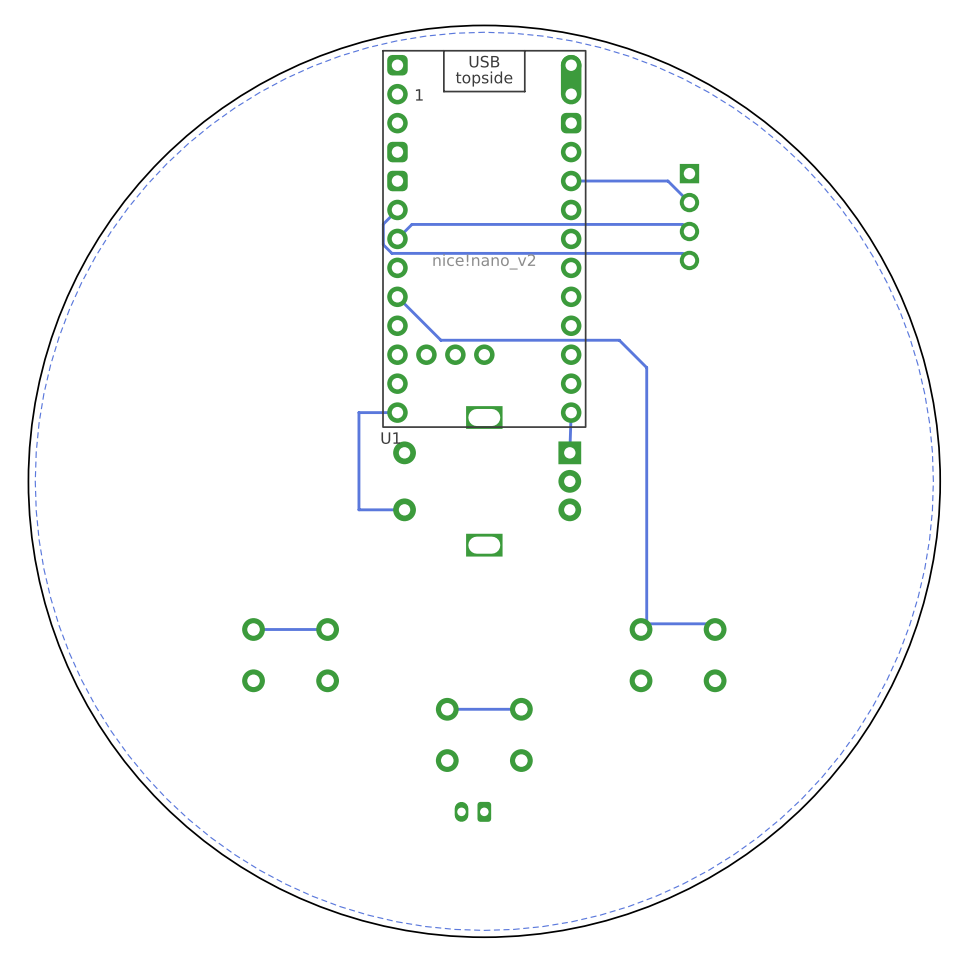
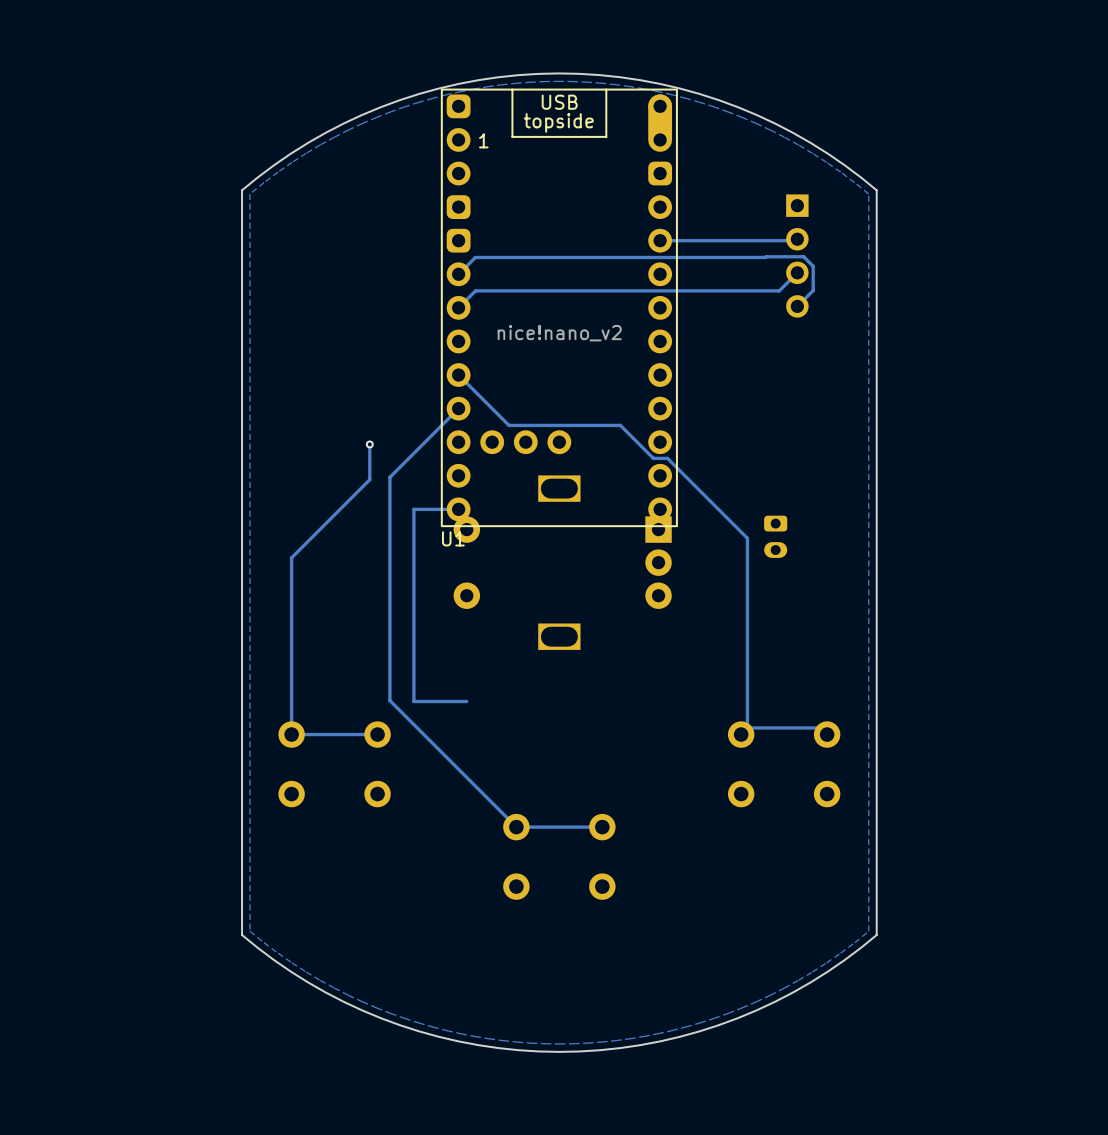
round board edge: [27, 24, 942, 939] -> none
zone outline: (484, 32) (513, 33) (571, 40) (628, 56) (656, 66) (682, 78) (733, 107) (780, 143) (801, 163) (821, 185) (857, 231) (887, 282) (899, 309) (909, 336) (924, 393) (932, 451) (933, 481) (932, 510) (924, 568) (909, 625) (899, 653) (887, 679) (857, 730) (821, 777) (801, 798) (780, 818) (733, 854) (682, 884) (656, 896) (628, 906) (571, 921) (513, 929) (484, 930) (425, 926) (396, 921) (339, 906) (312, 896) (285, 884) (234, 854) (188, 818) (166, 798) (146, 777) (110, 730) (81, 679) (69, 653) (59, 625) (43, 568) (39, 539) (35, 481) (36, 451) (43, 393) (59, 336) (69, 309) (81, 282) (110, 231) (146, 185) (166, 163) (188, 143) (234, 107) (285, 78) (312, 66) (339, 56) (396, 40) (454, 33) (484, 32) -> (559, 81) (601, 83) (643, 88) (685, 98) (728, 111) (770, 130) (798, 144) (840, 172) (868, 193) (868, 931) (840, 953) (798, 980) (770, 995) (728, 1013) (685, 1027) (643, 1036) (601, 1042) (559, 1043) (517, 1042) (474, 1036) (432, 1027) (390, 1013) (348, 995) (320, 980) (278, 953) (249, 931) (249, 193) (278, 172) (320, 144) (348, 130) (390, 111) (432, 98) (474, 88) (517, 83) (559, 81)
board edge: none -> (876, 190) (876, 935) (844, 960) (810, 982) (775, 1001) (737, 1018) (679, 1036) (640, 1045) (599, 1050) (559, 1051) (518, 1050) (478, 1045) (438, 1036) (399, 1025) (362, 1010) (325, 992) (290, 971) (242, 935) (242, 190) (274, 165) (325, 132) (362, 114) (399, 100) (438, 88) (478, 80) (518, 75) (559, 73) (599, 75) (640, 80) (679, 88) (718, 100) (756, 114) (793, 132) (844, 165) (876, 190)
track: (571, 181) (667, 181) (689, 202) -> (660, 240) (797, 239)
track: (397, 209) (383, 224) (383, 244) (391, 253) (682, 253) (689, 260) -> (458, 274) (475, 257) (803, 256) (813, 266) (813, 290) (797, 306)
track: (689, 231) (682, 224) (411, 224) (397, 238) -> (797, 272) (779, 290) (475, 290) (458, 307)
U1 position: (484, 238) -> (559, 307)
track: (397, 296) (440, 340) (619, 340) (646, 367) (646, 623) -> none
track: none -> (458, 375) (508, 425) (620, 425) (653, 458) (667, 458) (747, 538) (747, 734)
track: none -> (458, 408) (389, 477) (389, 700) (516, 827)
track: none -> (369, 444) (369, 479) (291, 557) (291, 734)
via: none -> (369, 444)
track: (397, 412) (358, 412) (358, 435) -> (458, 509) (413, 509)
track: (571, 412) (569, 452) -> none
part: none -> (775, 536)
track: (404, 509) (358, 509) -> (466, 701) (413, 701) (413, 595)
part: (472, 811) -> none

